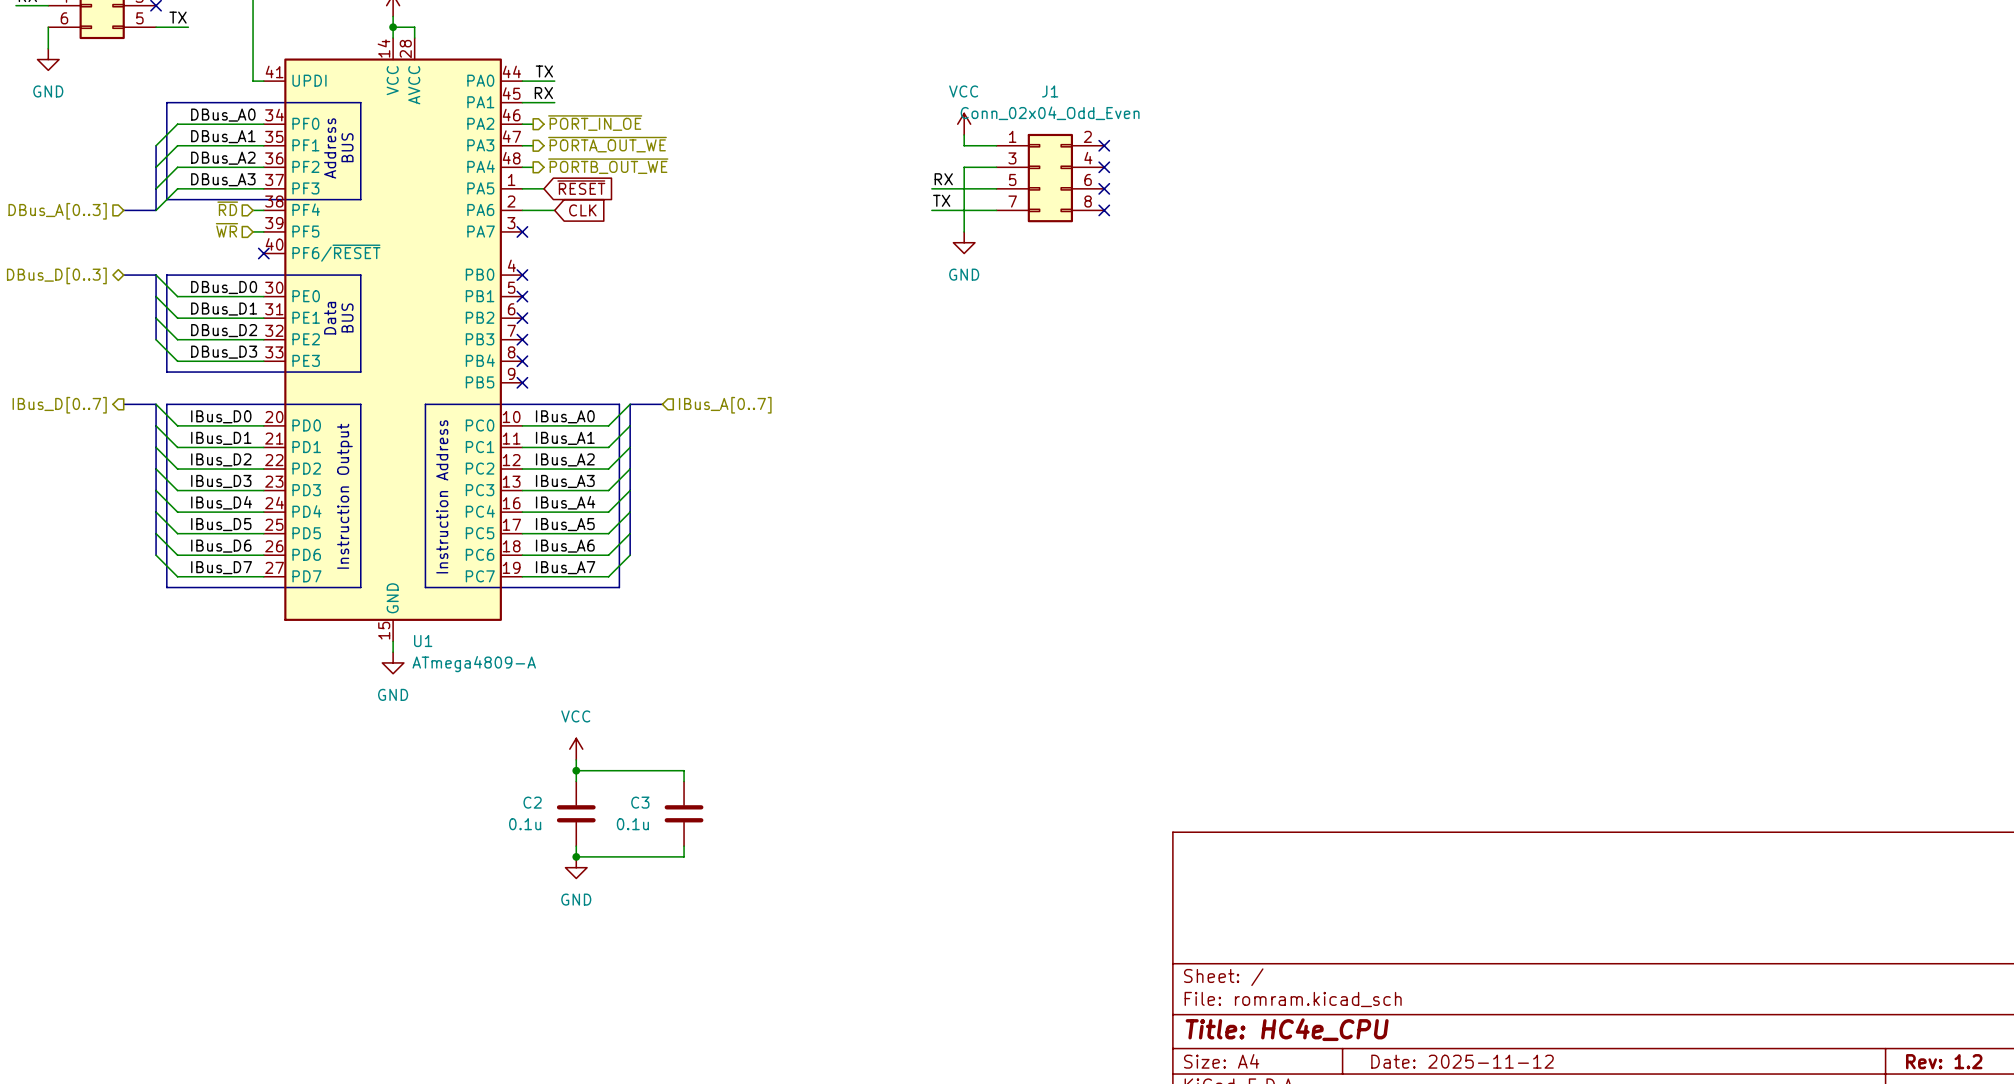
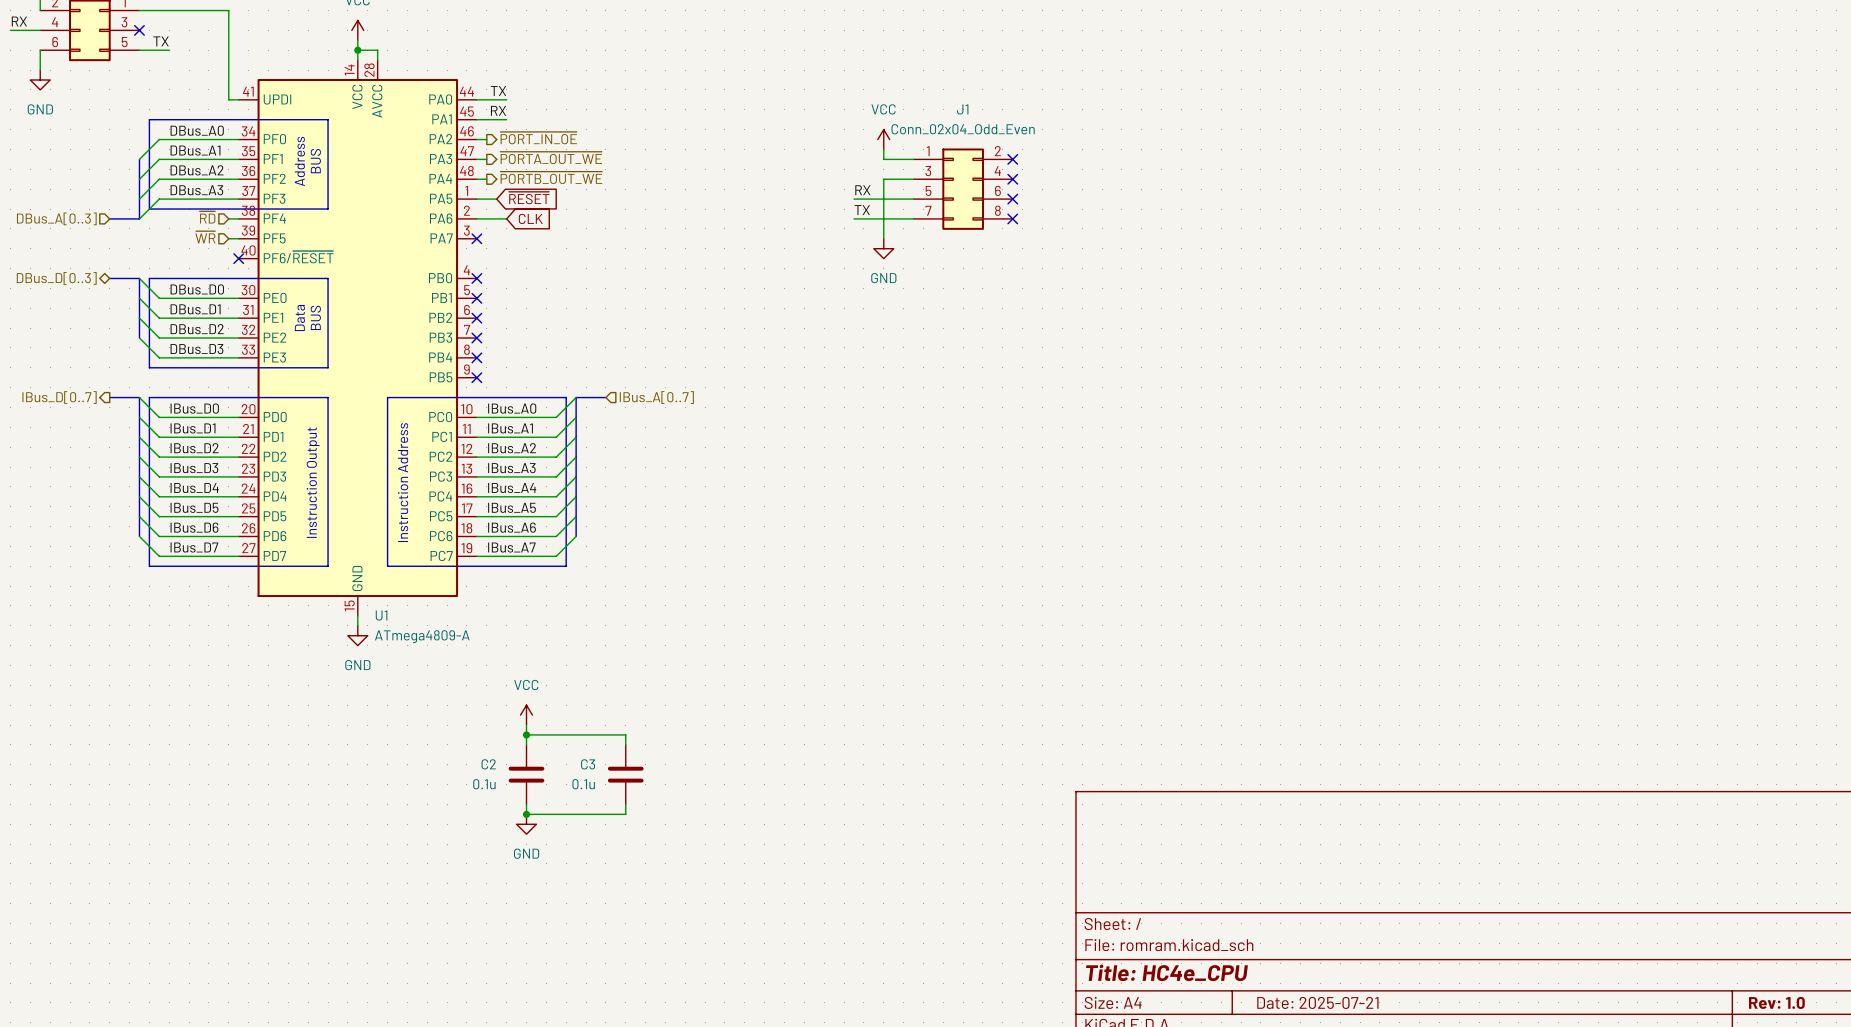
title block: Date: 2025-11-12 (1462, 1061) -> Date: 2025-07-21 (1317, 1002)
title block: Rev: 1.2 (1944, 1061) -> Rev: 1.0 (1776, 1002)

